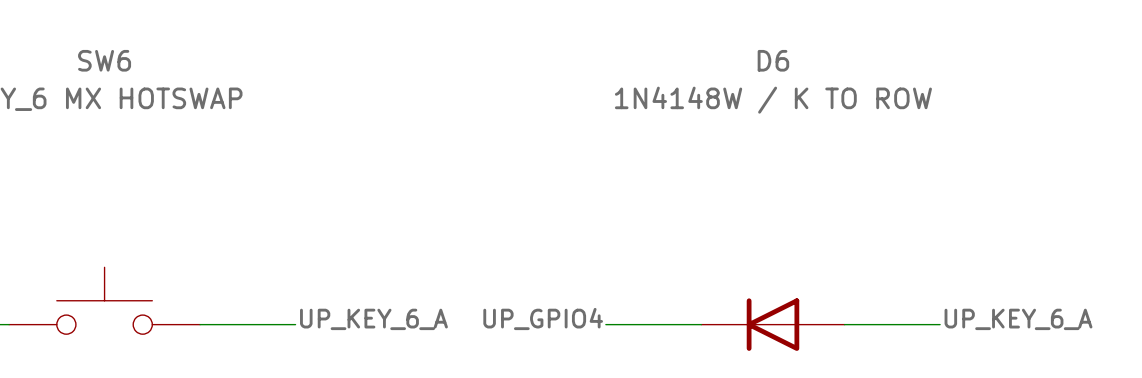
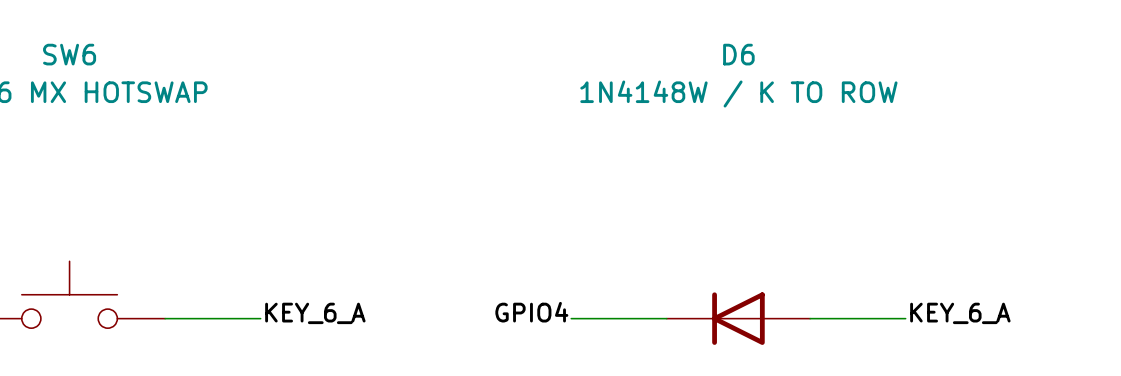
label: UP_GPIO4 (543, 318) -> GPIO4 (531, 312)
label: UP_KEY_6_A (373, 319) -> KEY_6_A (315, 313)
label: UP_KEY_6_A (1018, 319) -> KEY_6_A (960, 313)

